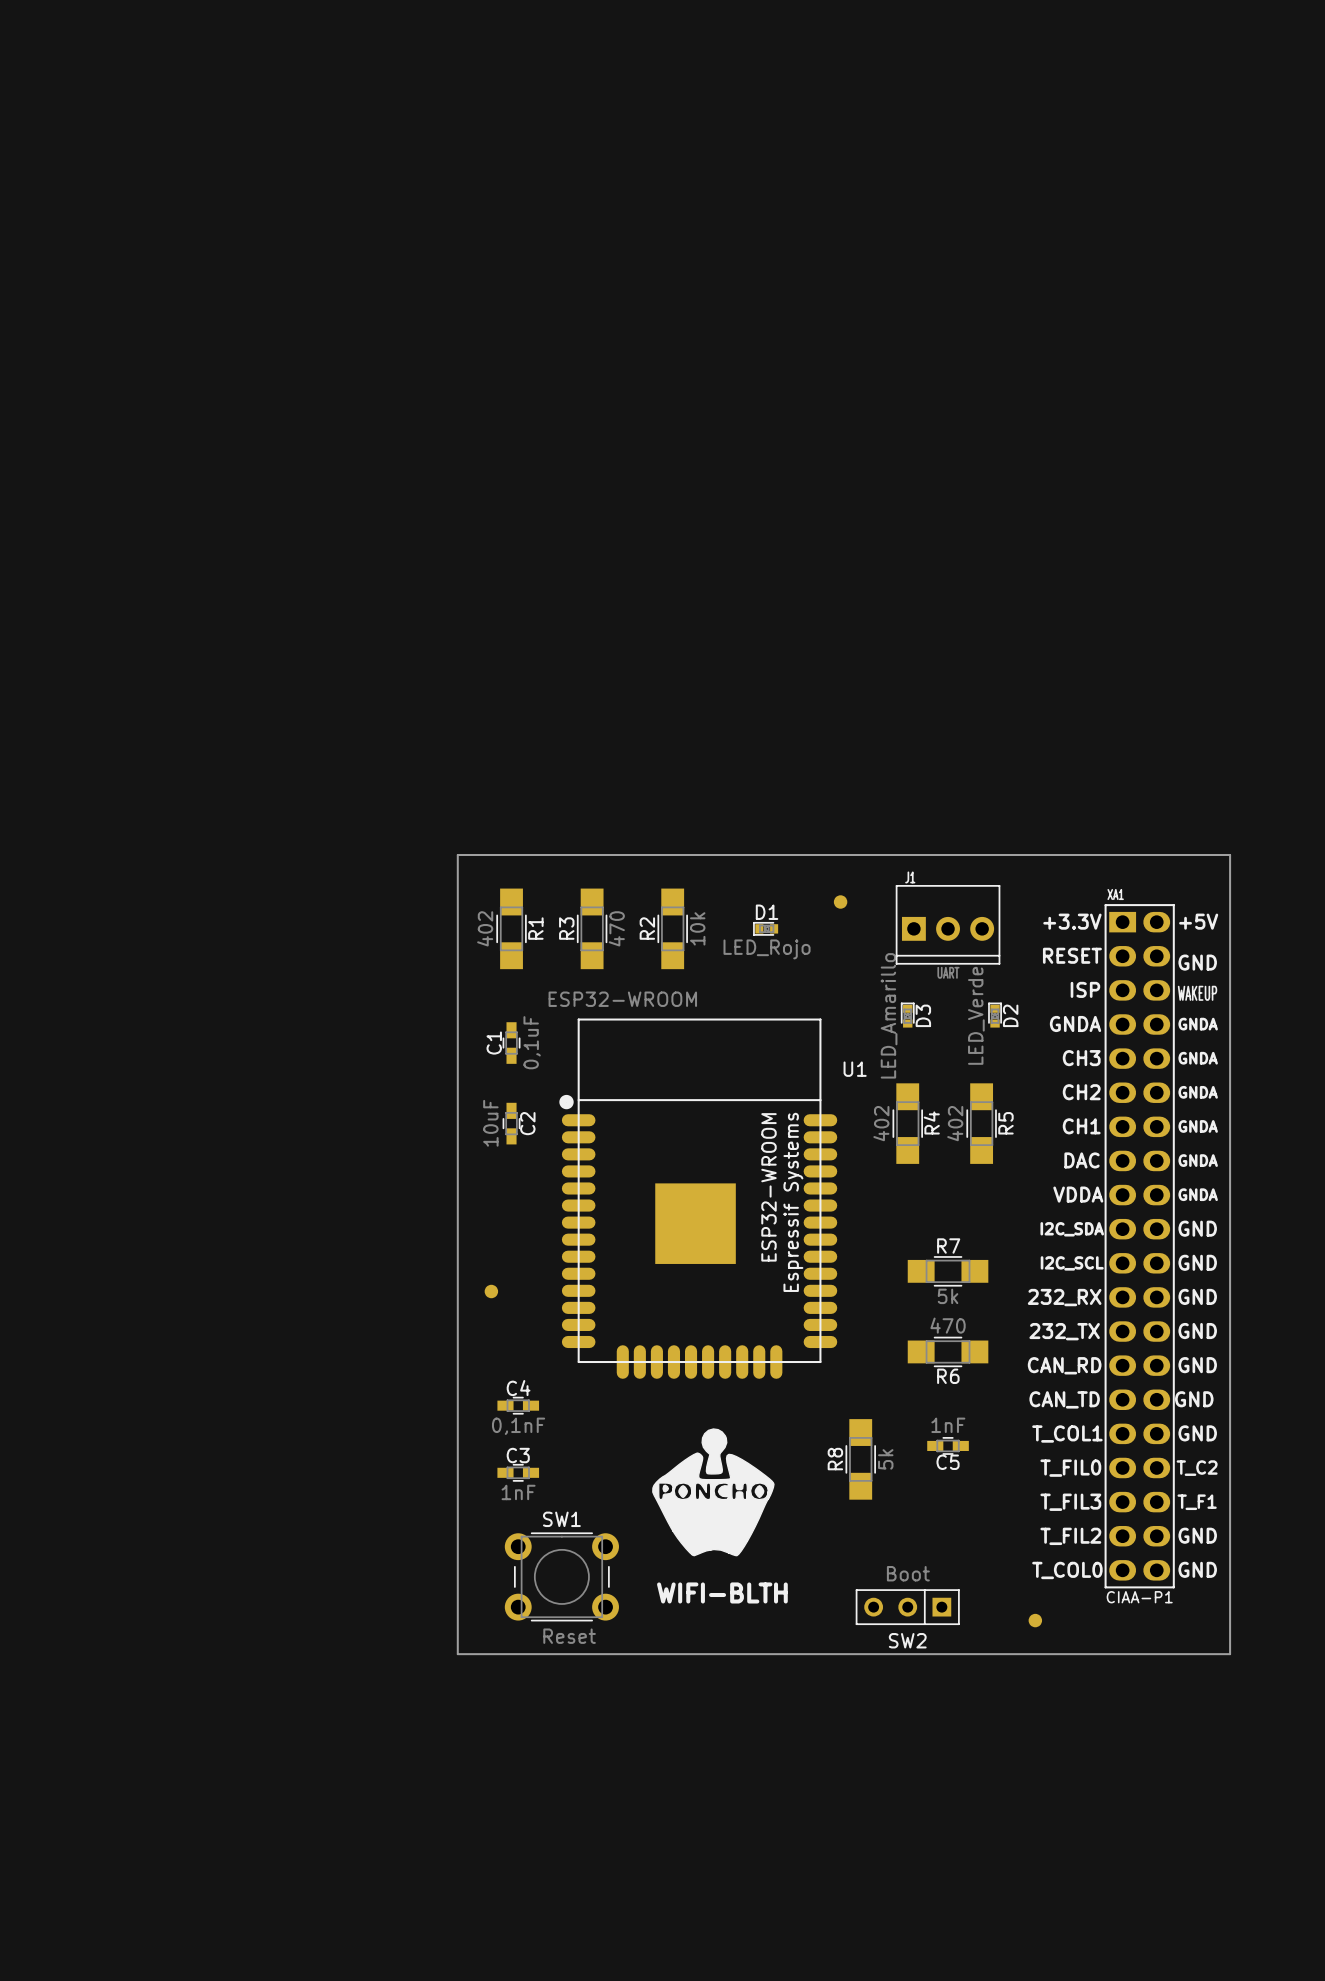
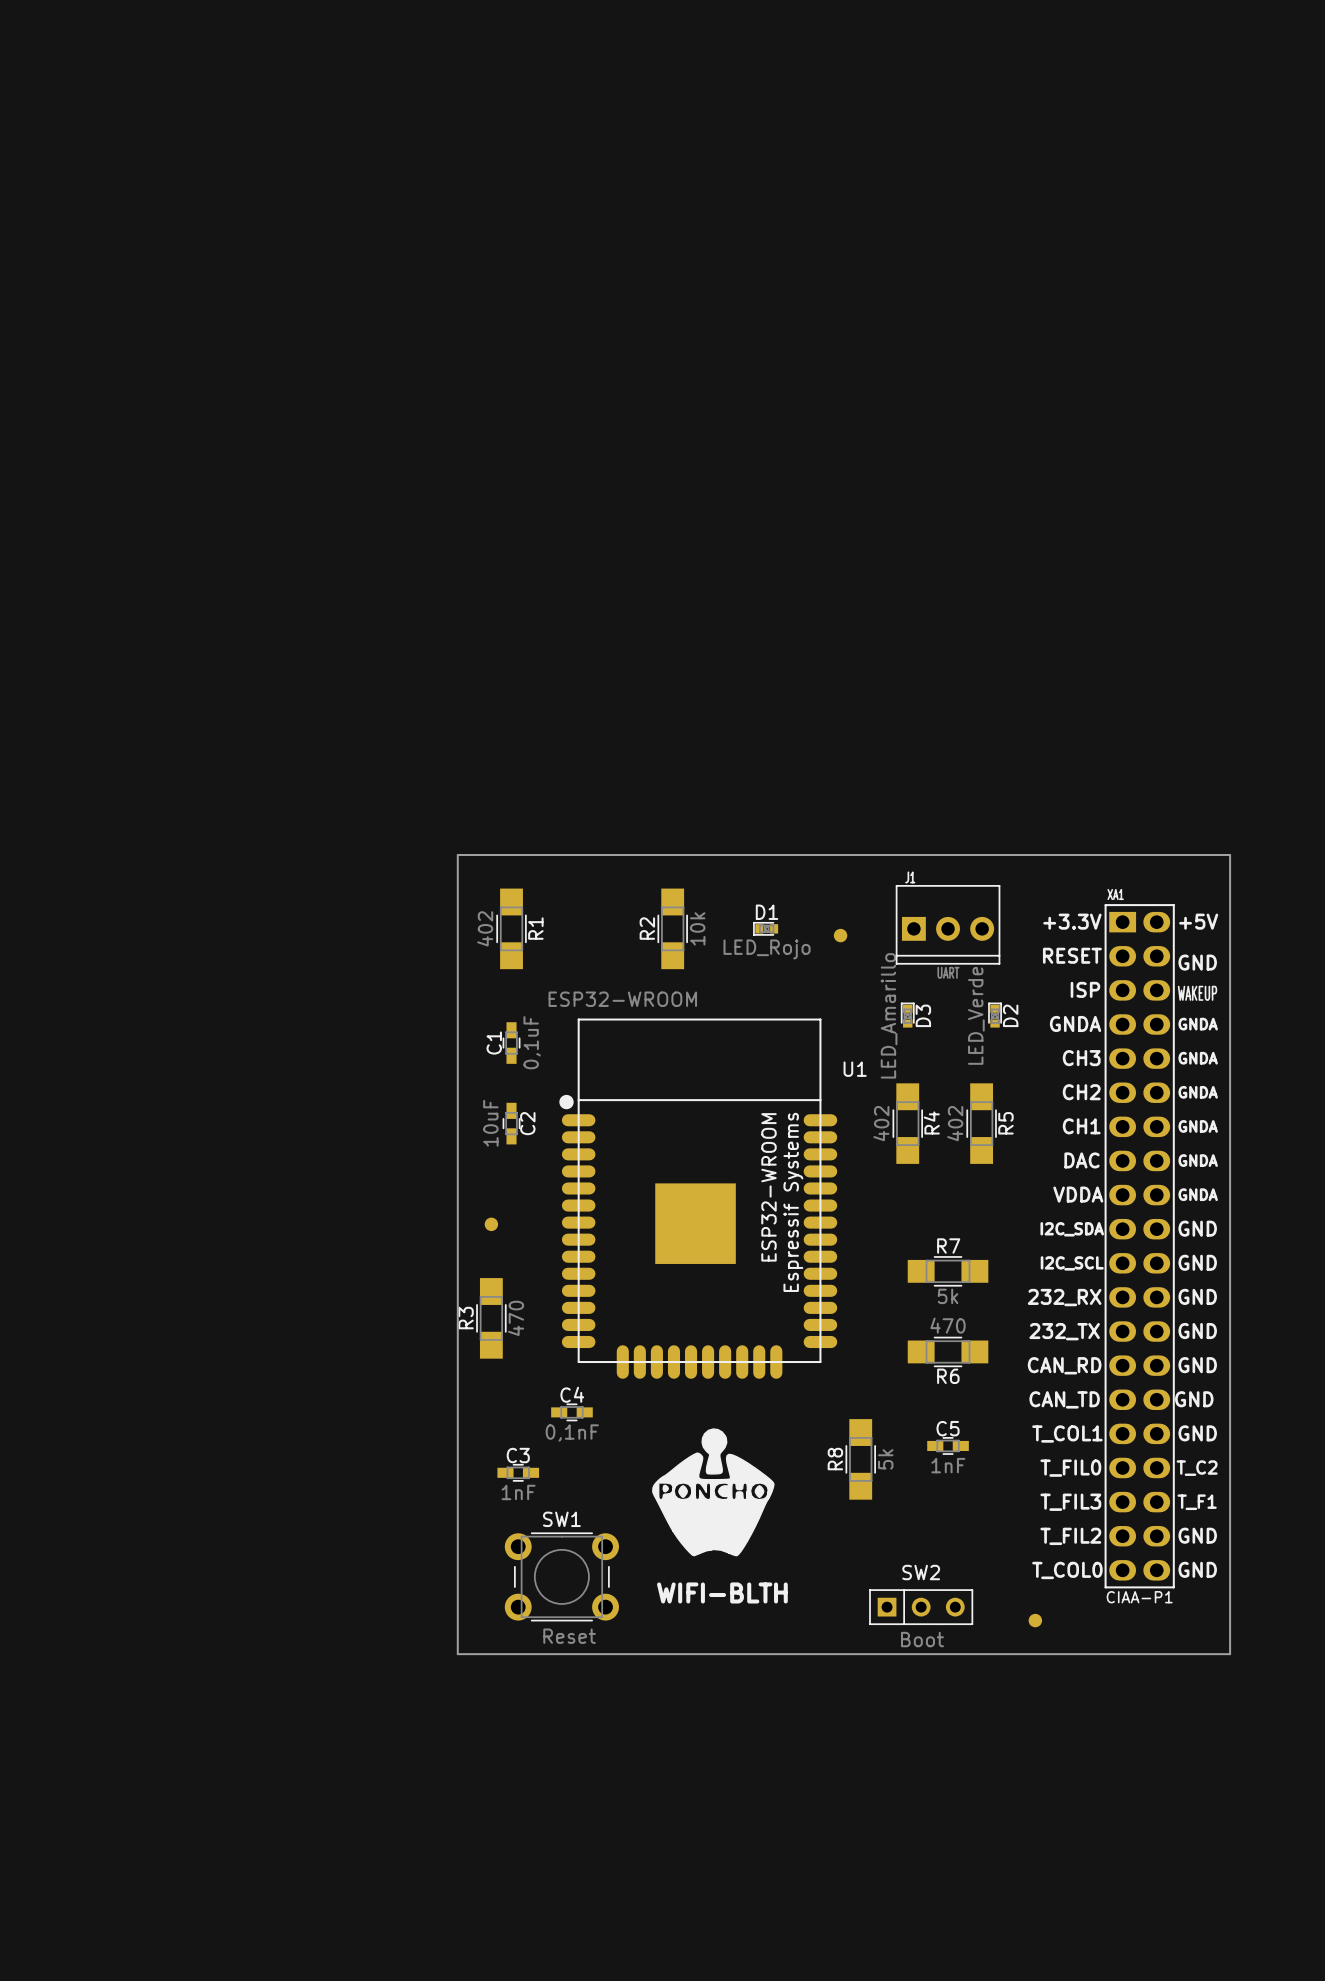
part position: (840, 902) -> (840, 935)
R3 position: (592, 928) -> (491, 1318)
part position: (491, 1291) -> (491, 1224)
C4 position: (518, 1405) -> (571, 1412)
C5 value position: 1nF (948, 1425) -> 1nF (948, 1465)
C5 name position: C5 (948, 1462) -> C5 (948, 1428)
SW2 rotation: 0° (907, 1607) -> 180° (921, 1607)

